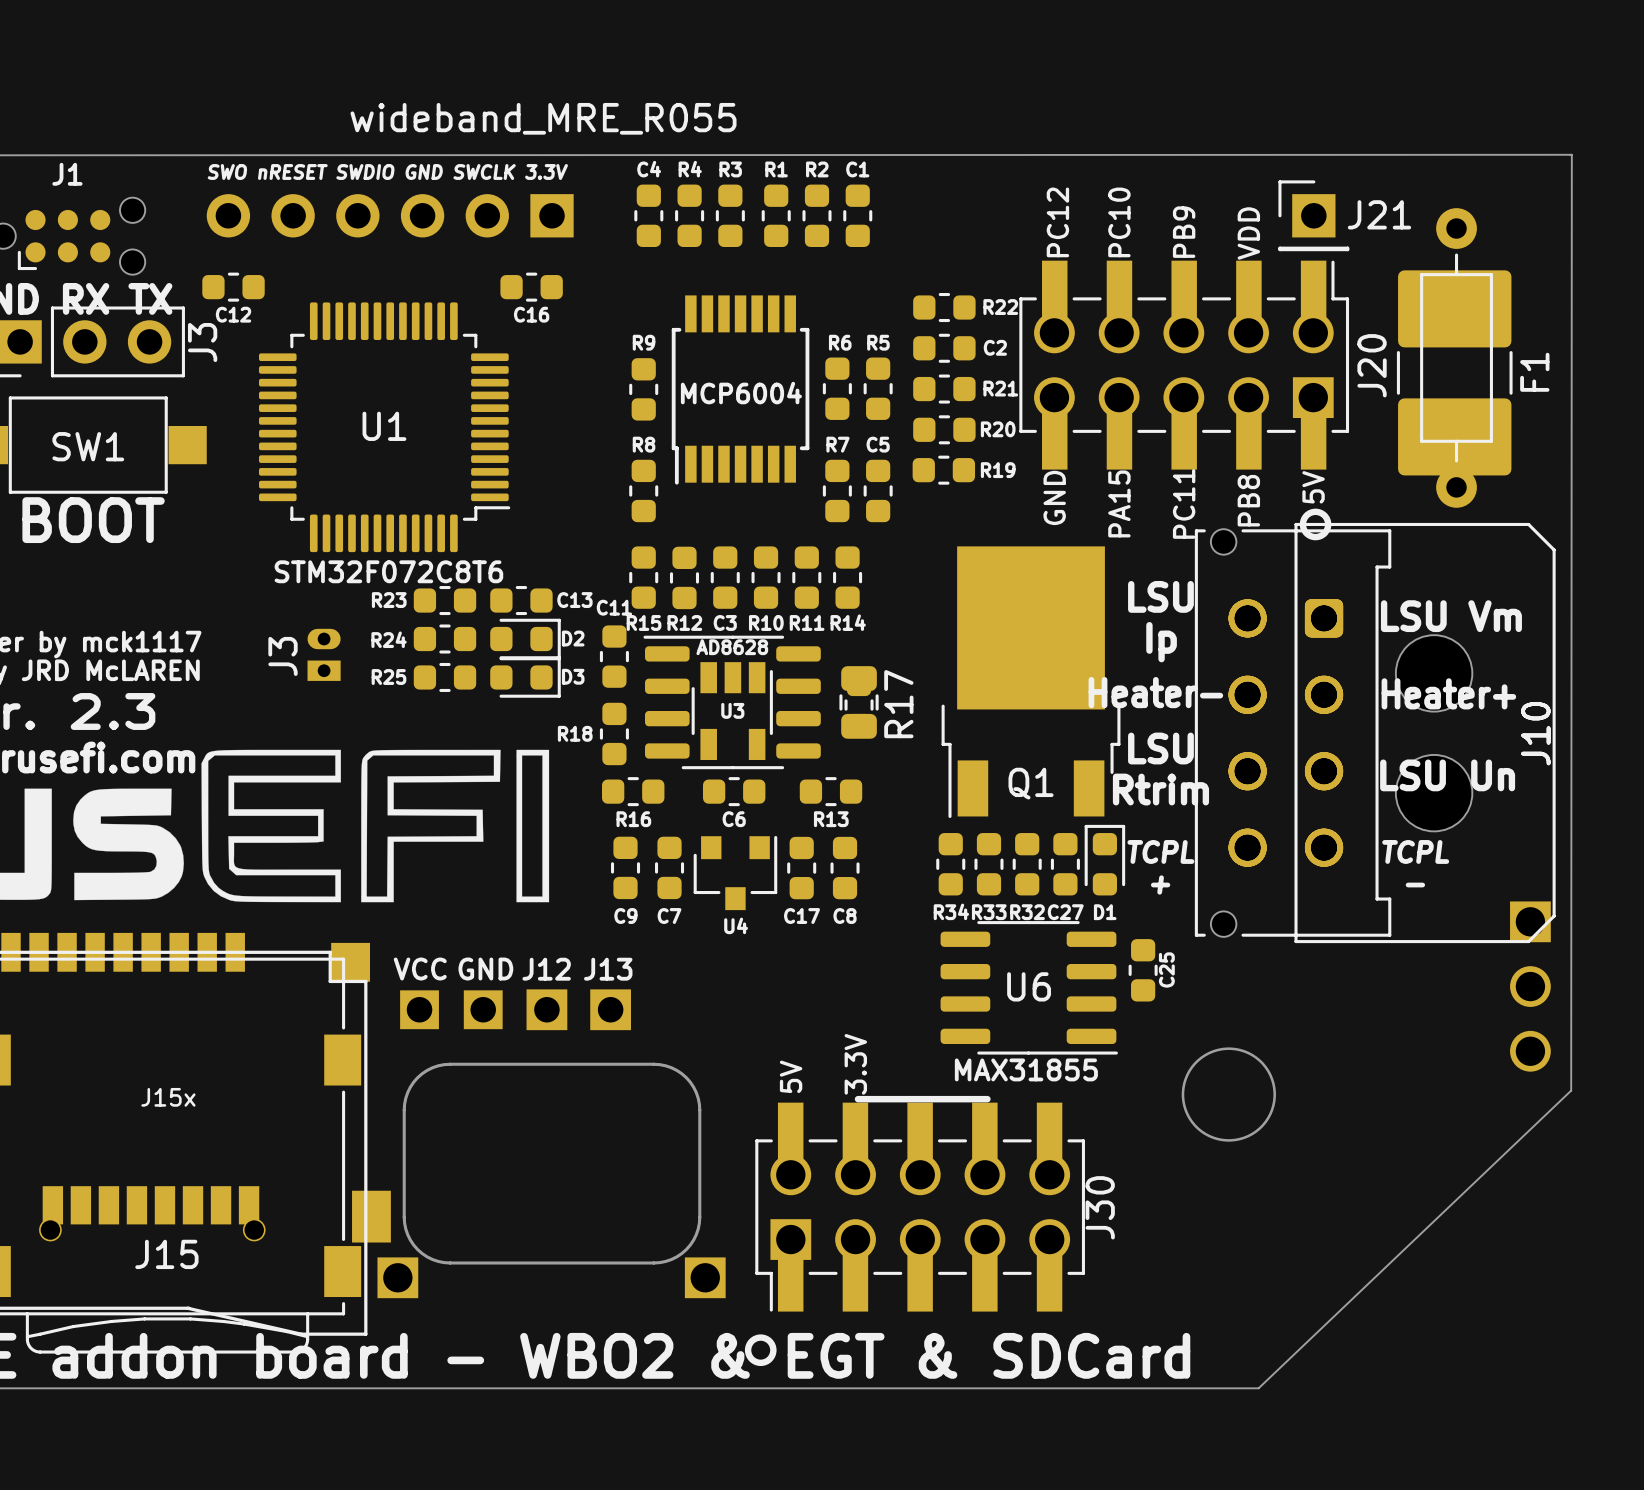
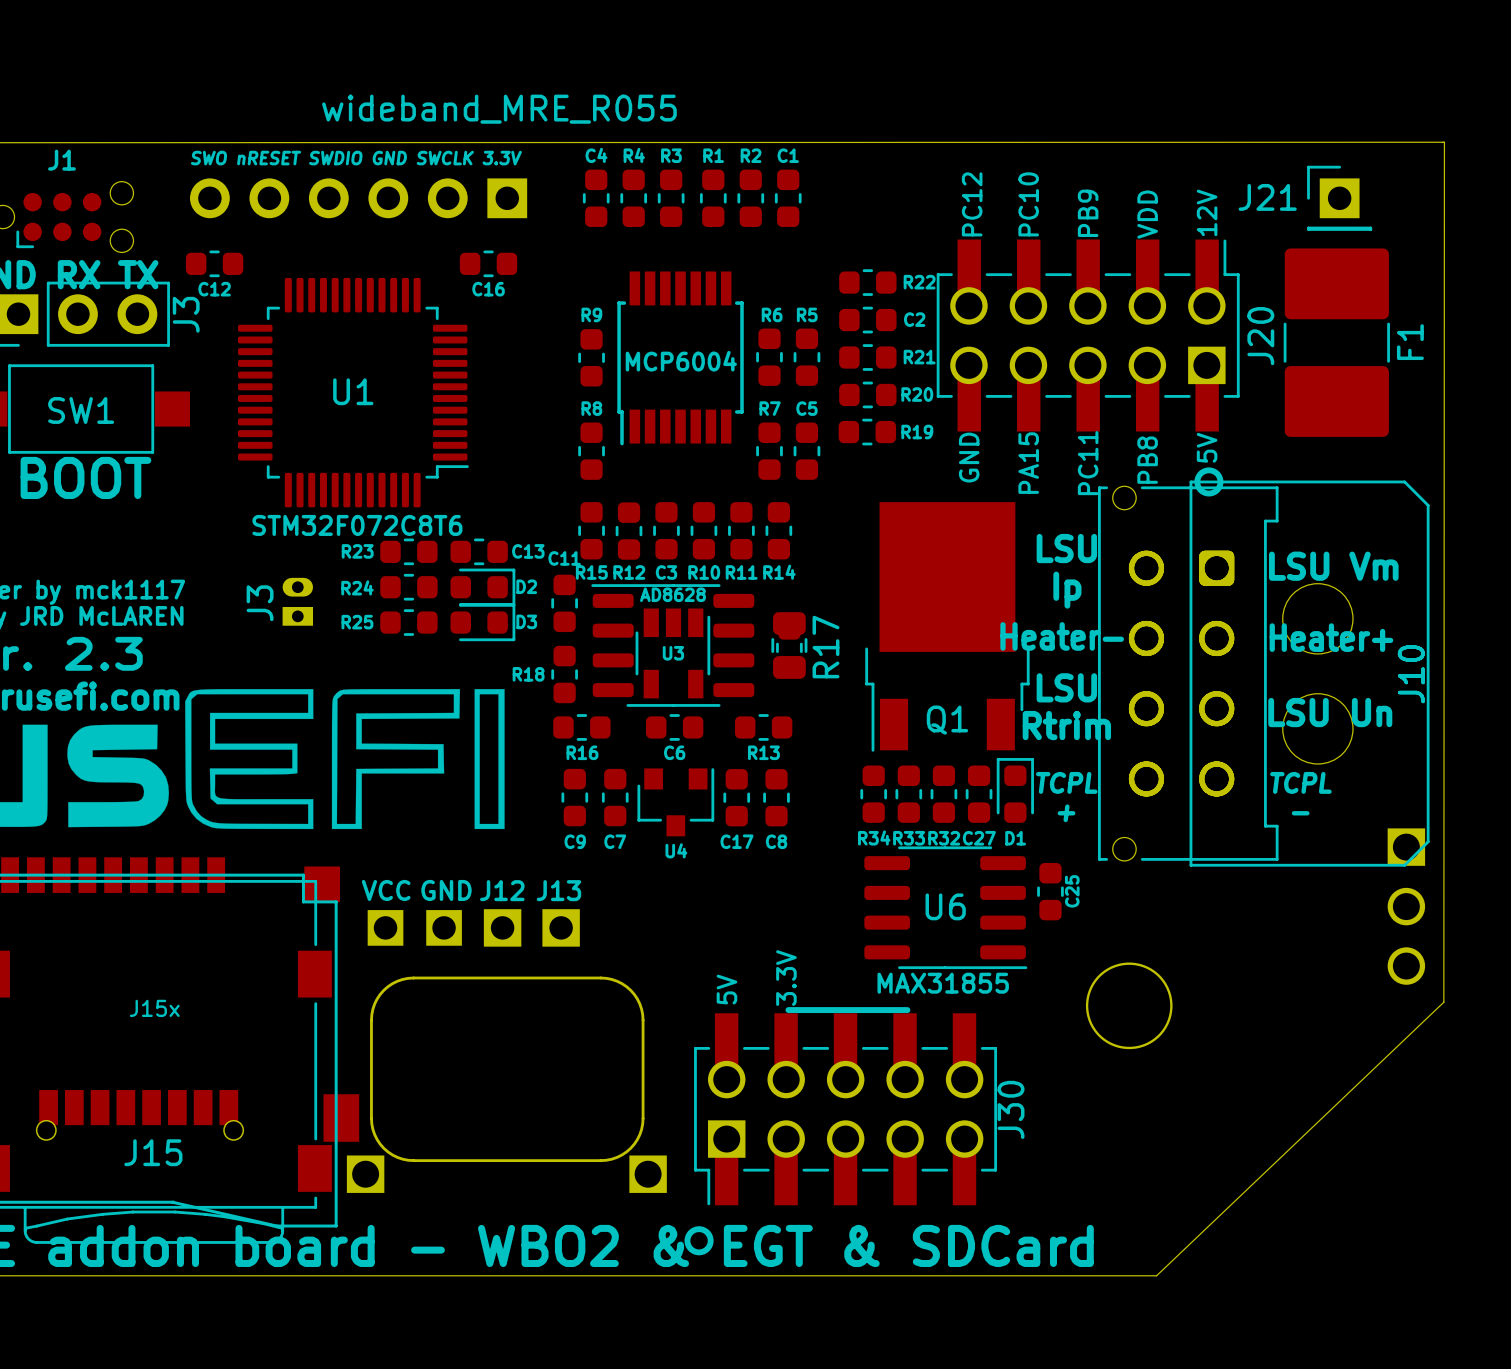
J21 position: (1313, 215) -> (1339, 198)
part text: none -> 12V (1207, 212)
part: (1456, 357) -> none

